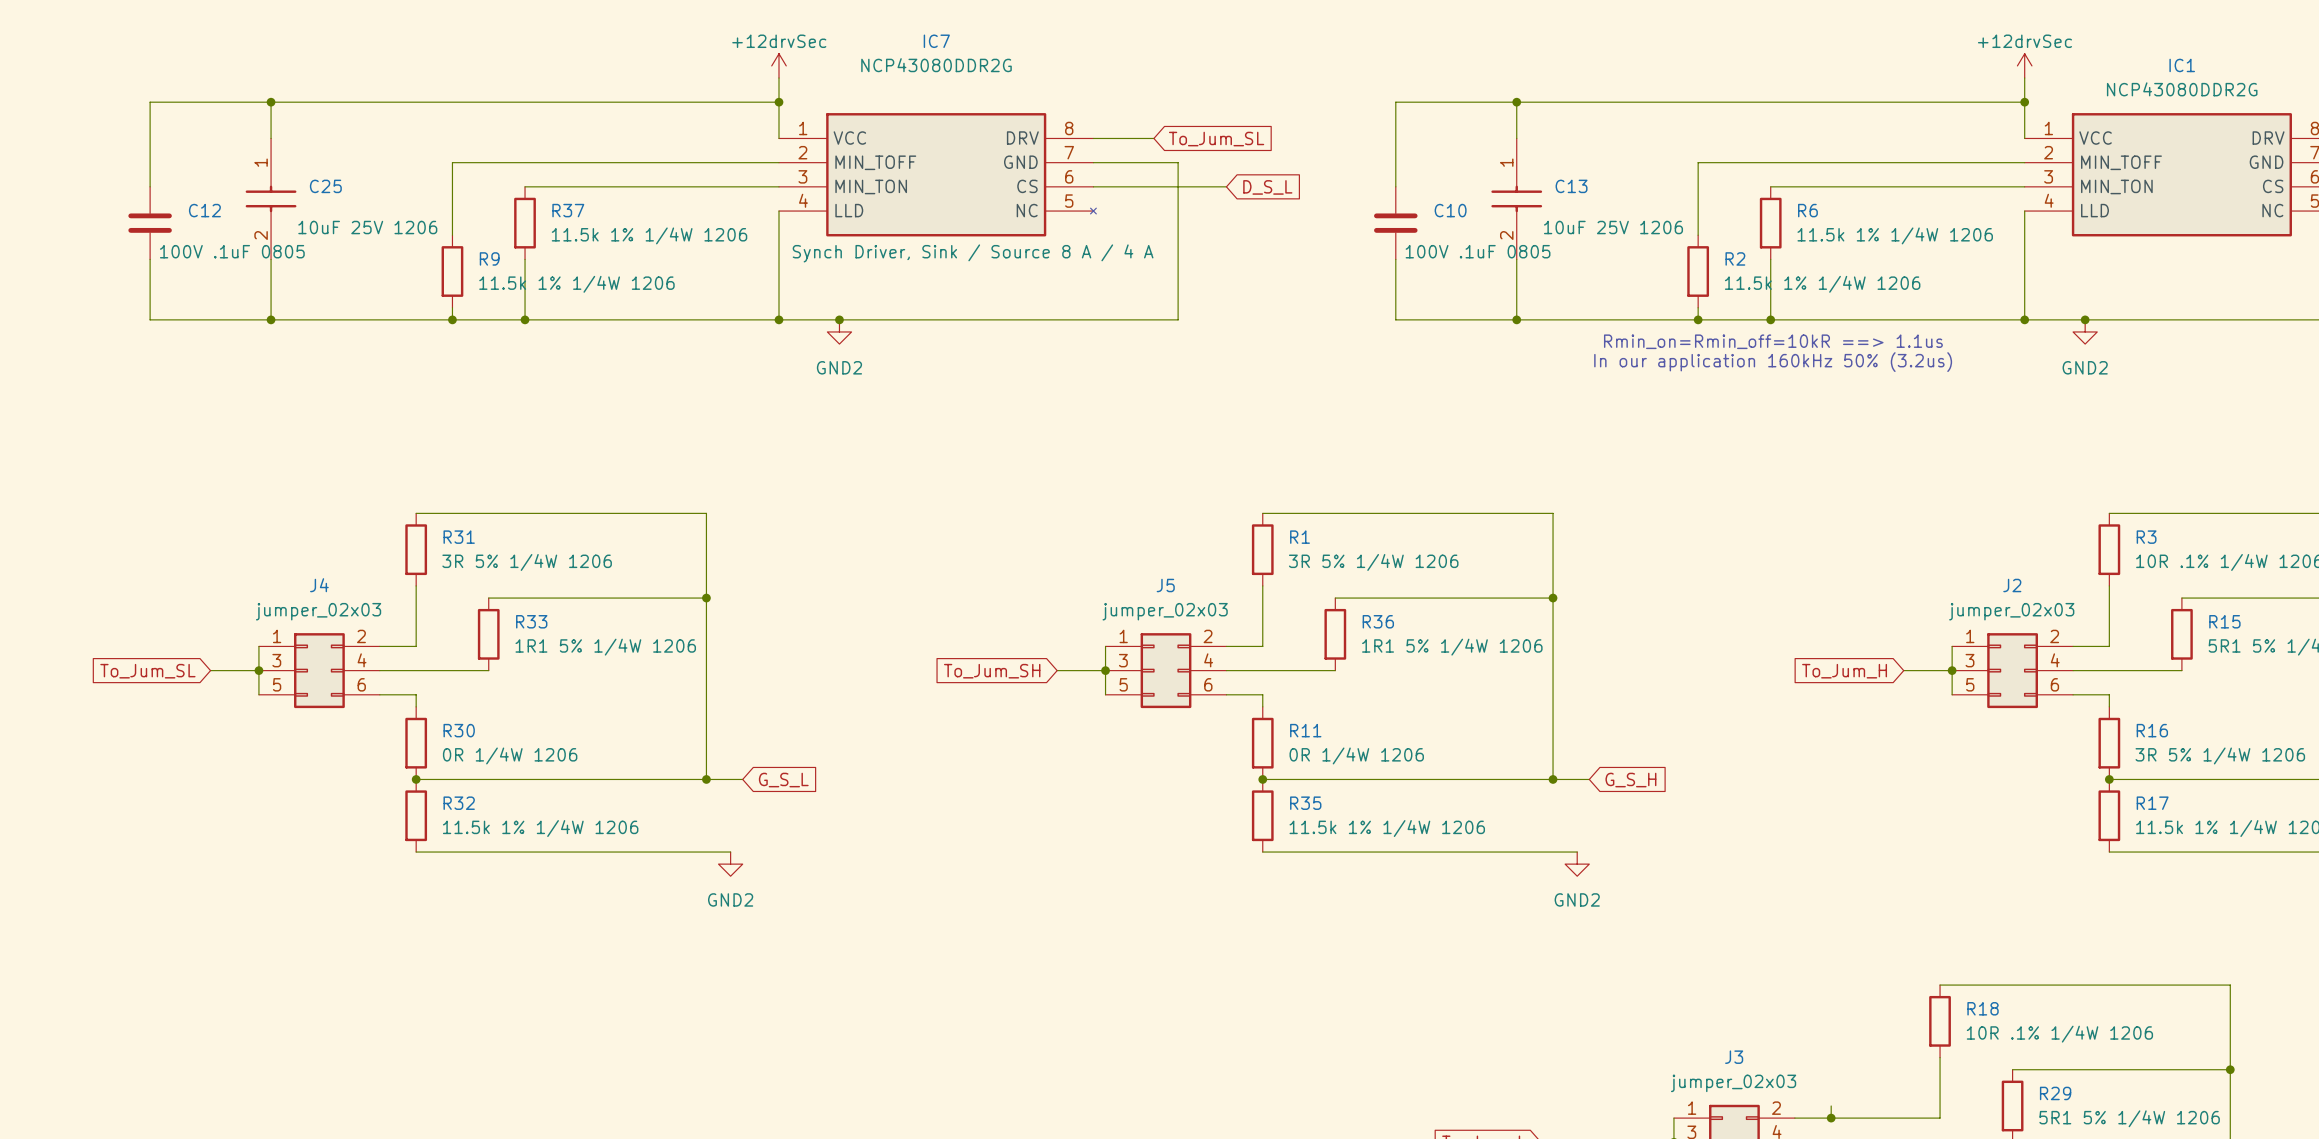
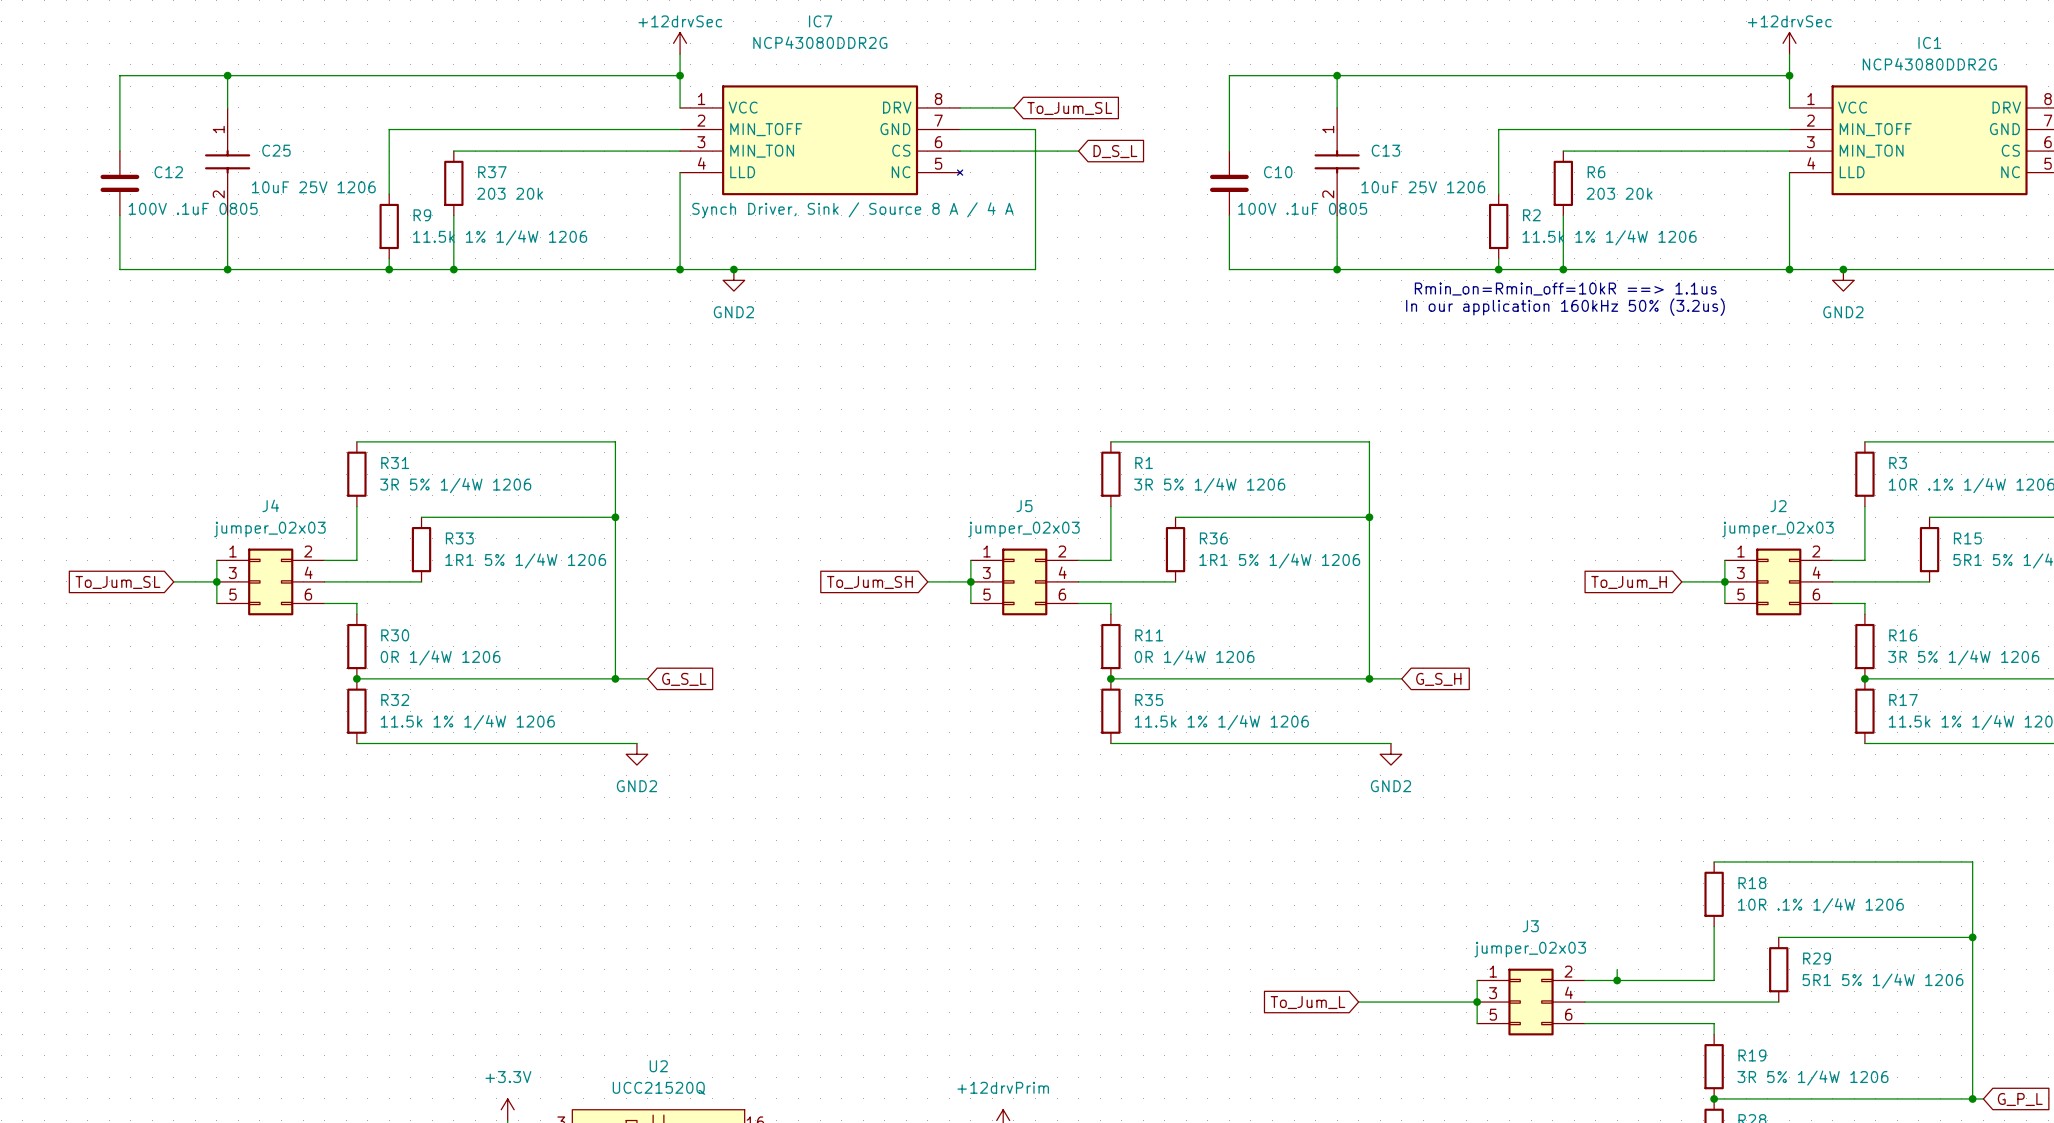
R37 text: 11.5k 1% 1/4W 1206 (649, 235) -> 203 20k (510, 193)
R6 text: 11.5k 1% 1/4W 1206 (1895, 235) -> 203 20k (1619, 193)

